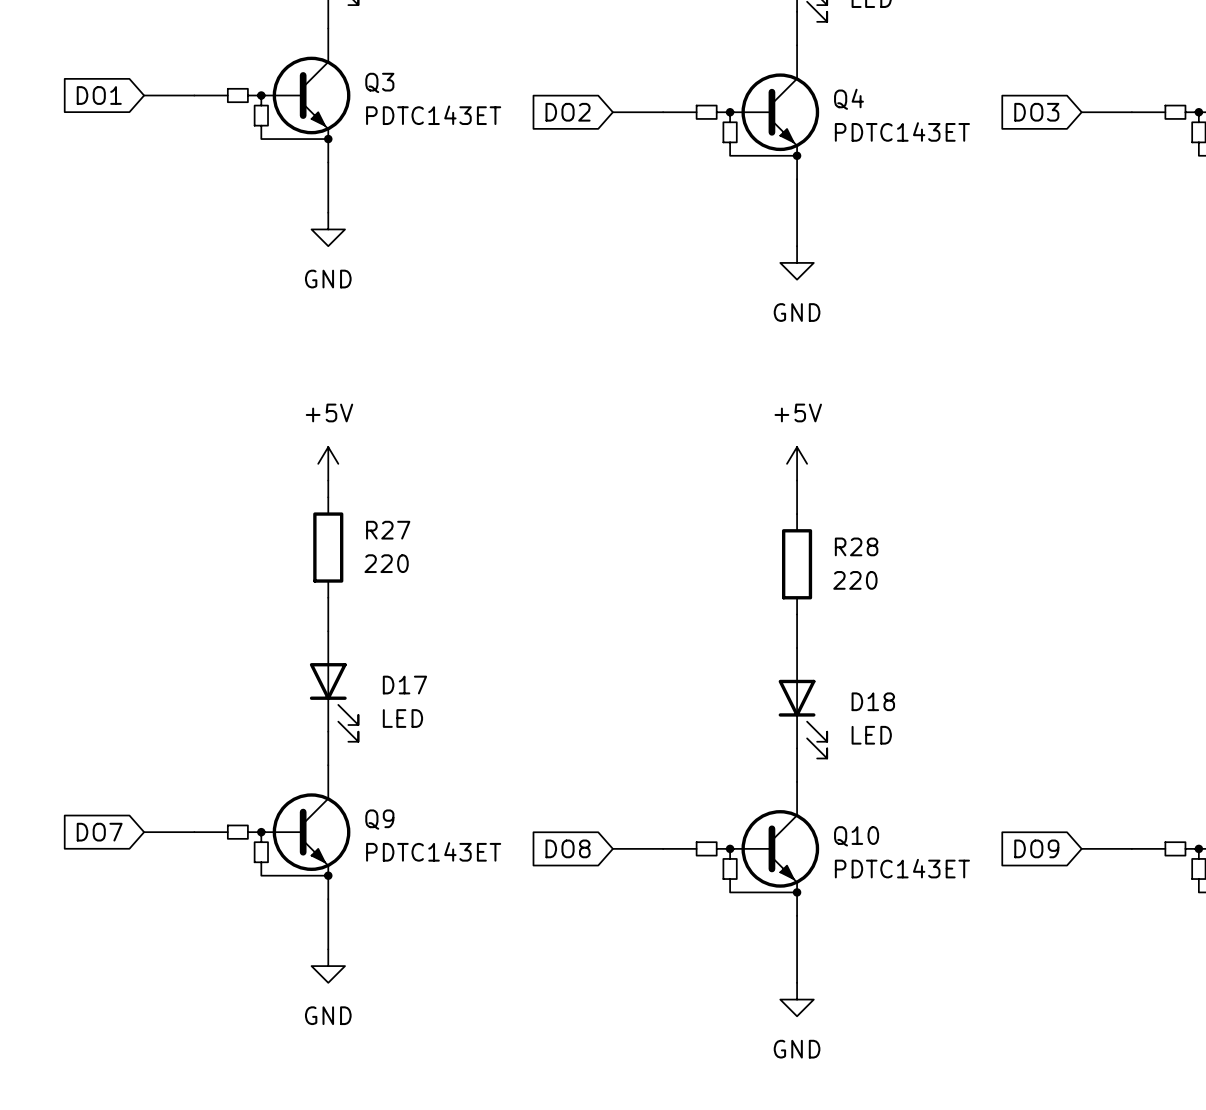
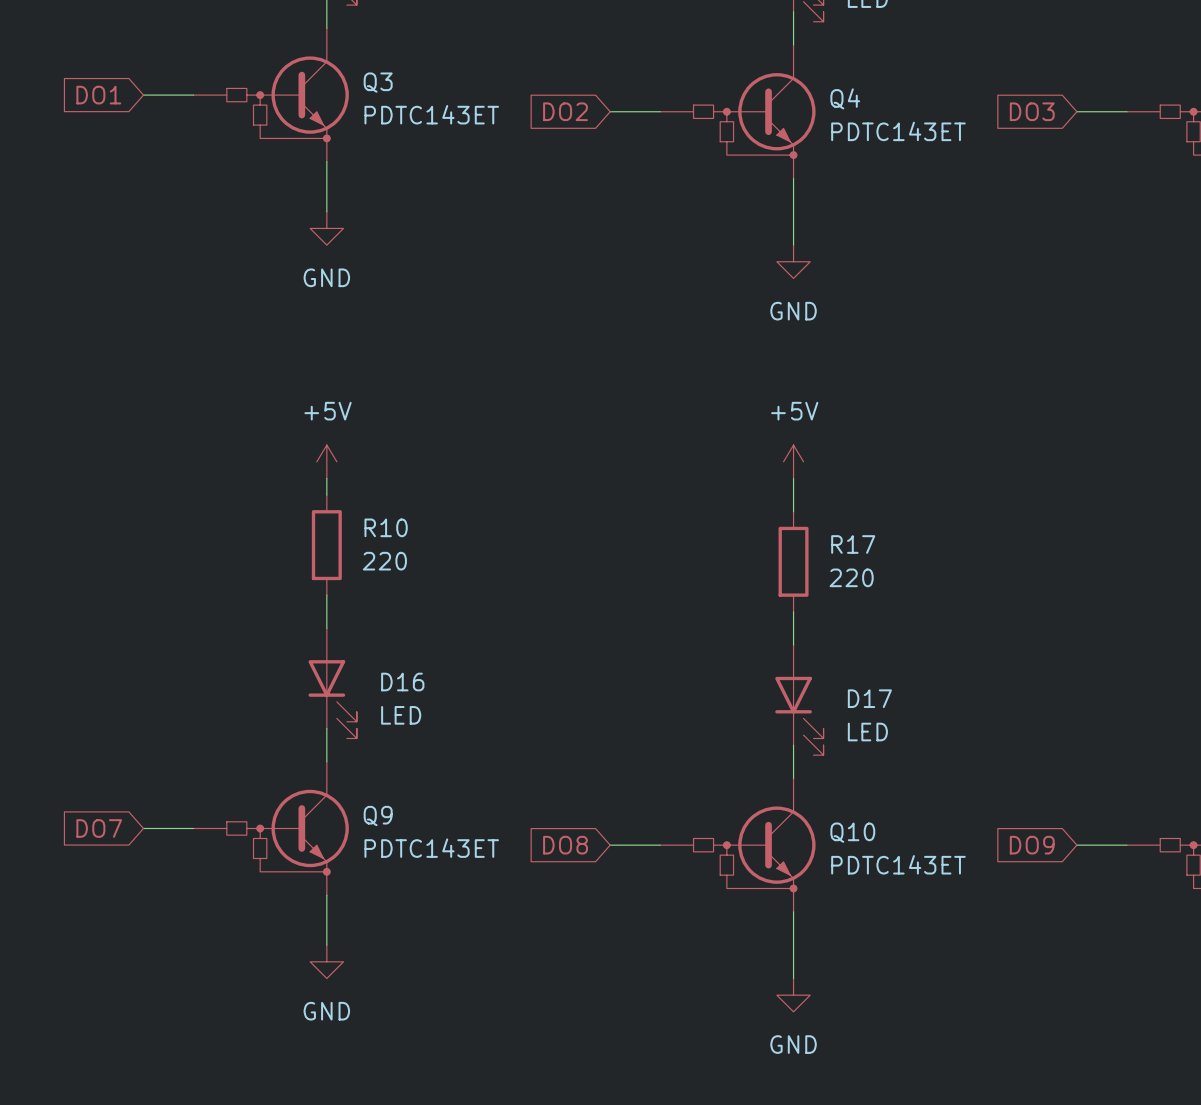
R27 name: R27 (388, 530) -> R10 (386, 527)
R28 name: R28 (856, 546) -> R17 (853, 544)
D17 name: D17 (404, 685) -> D16 (402, 682)
D18 name: D18 (873, 701) -> D17 (869, 698)

